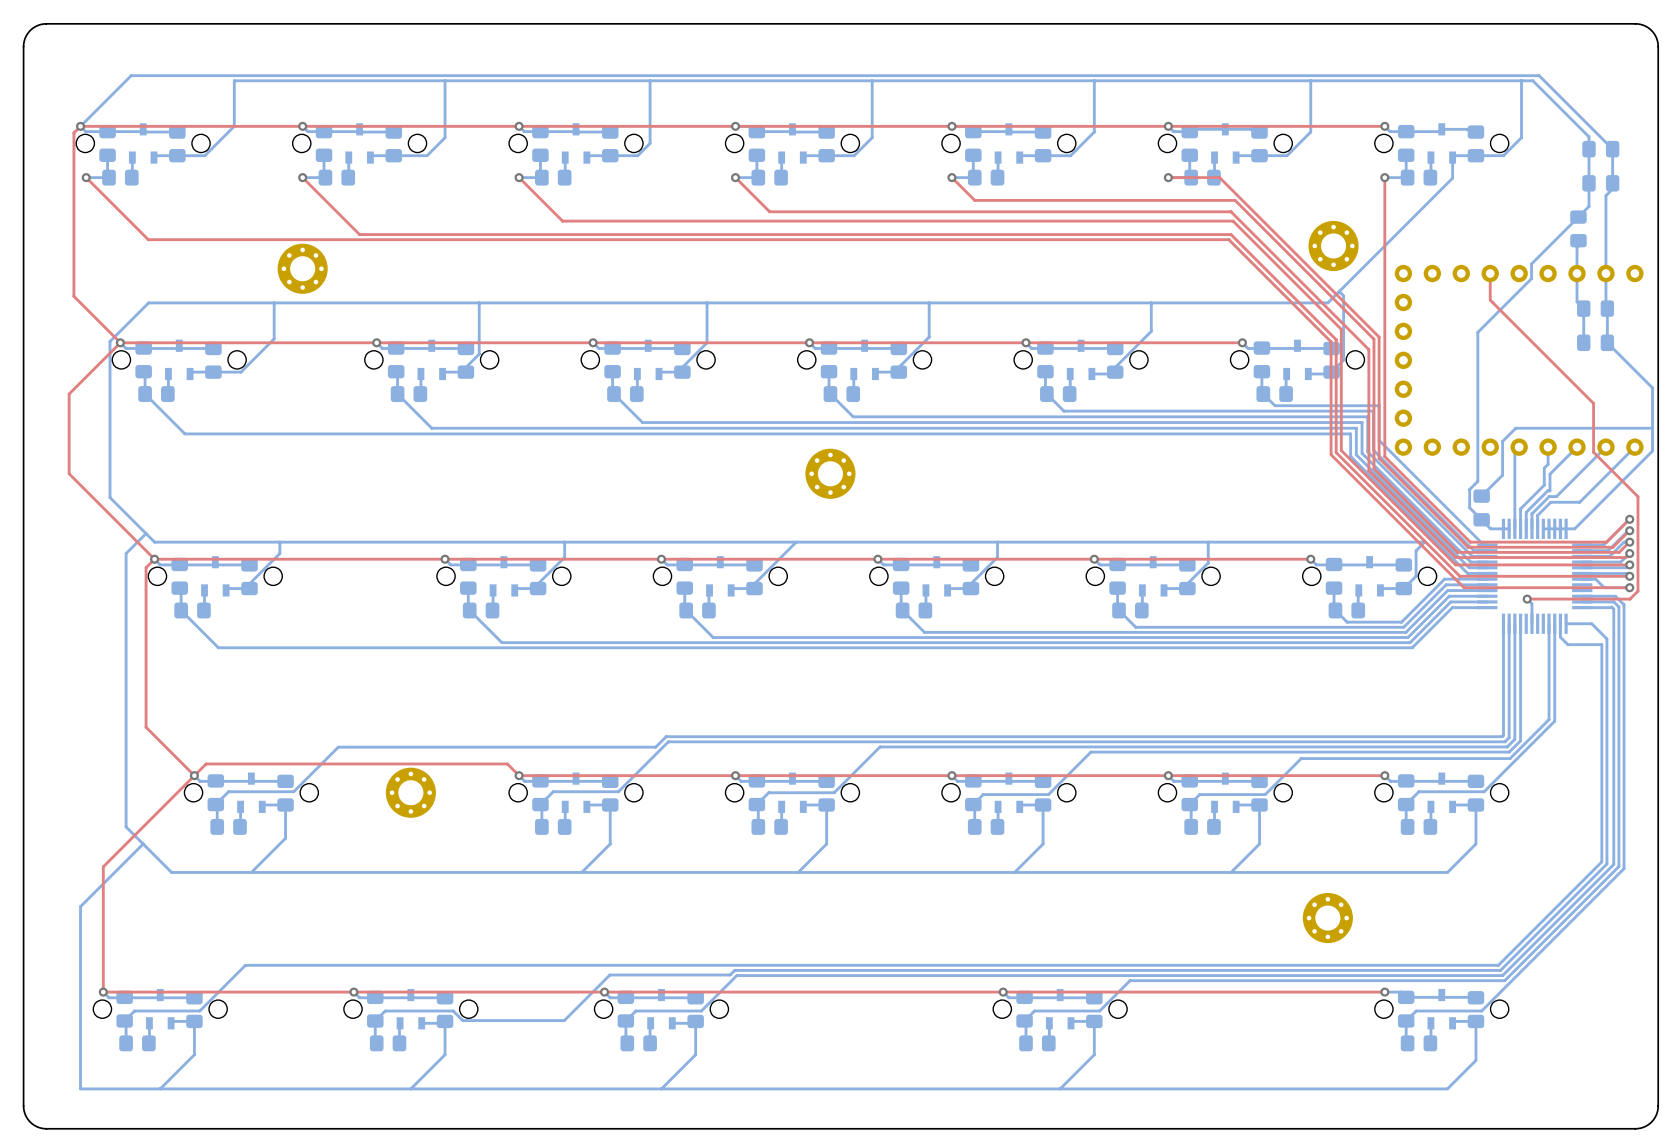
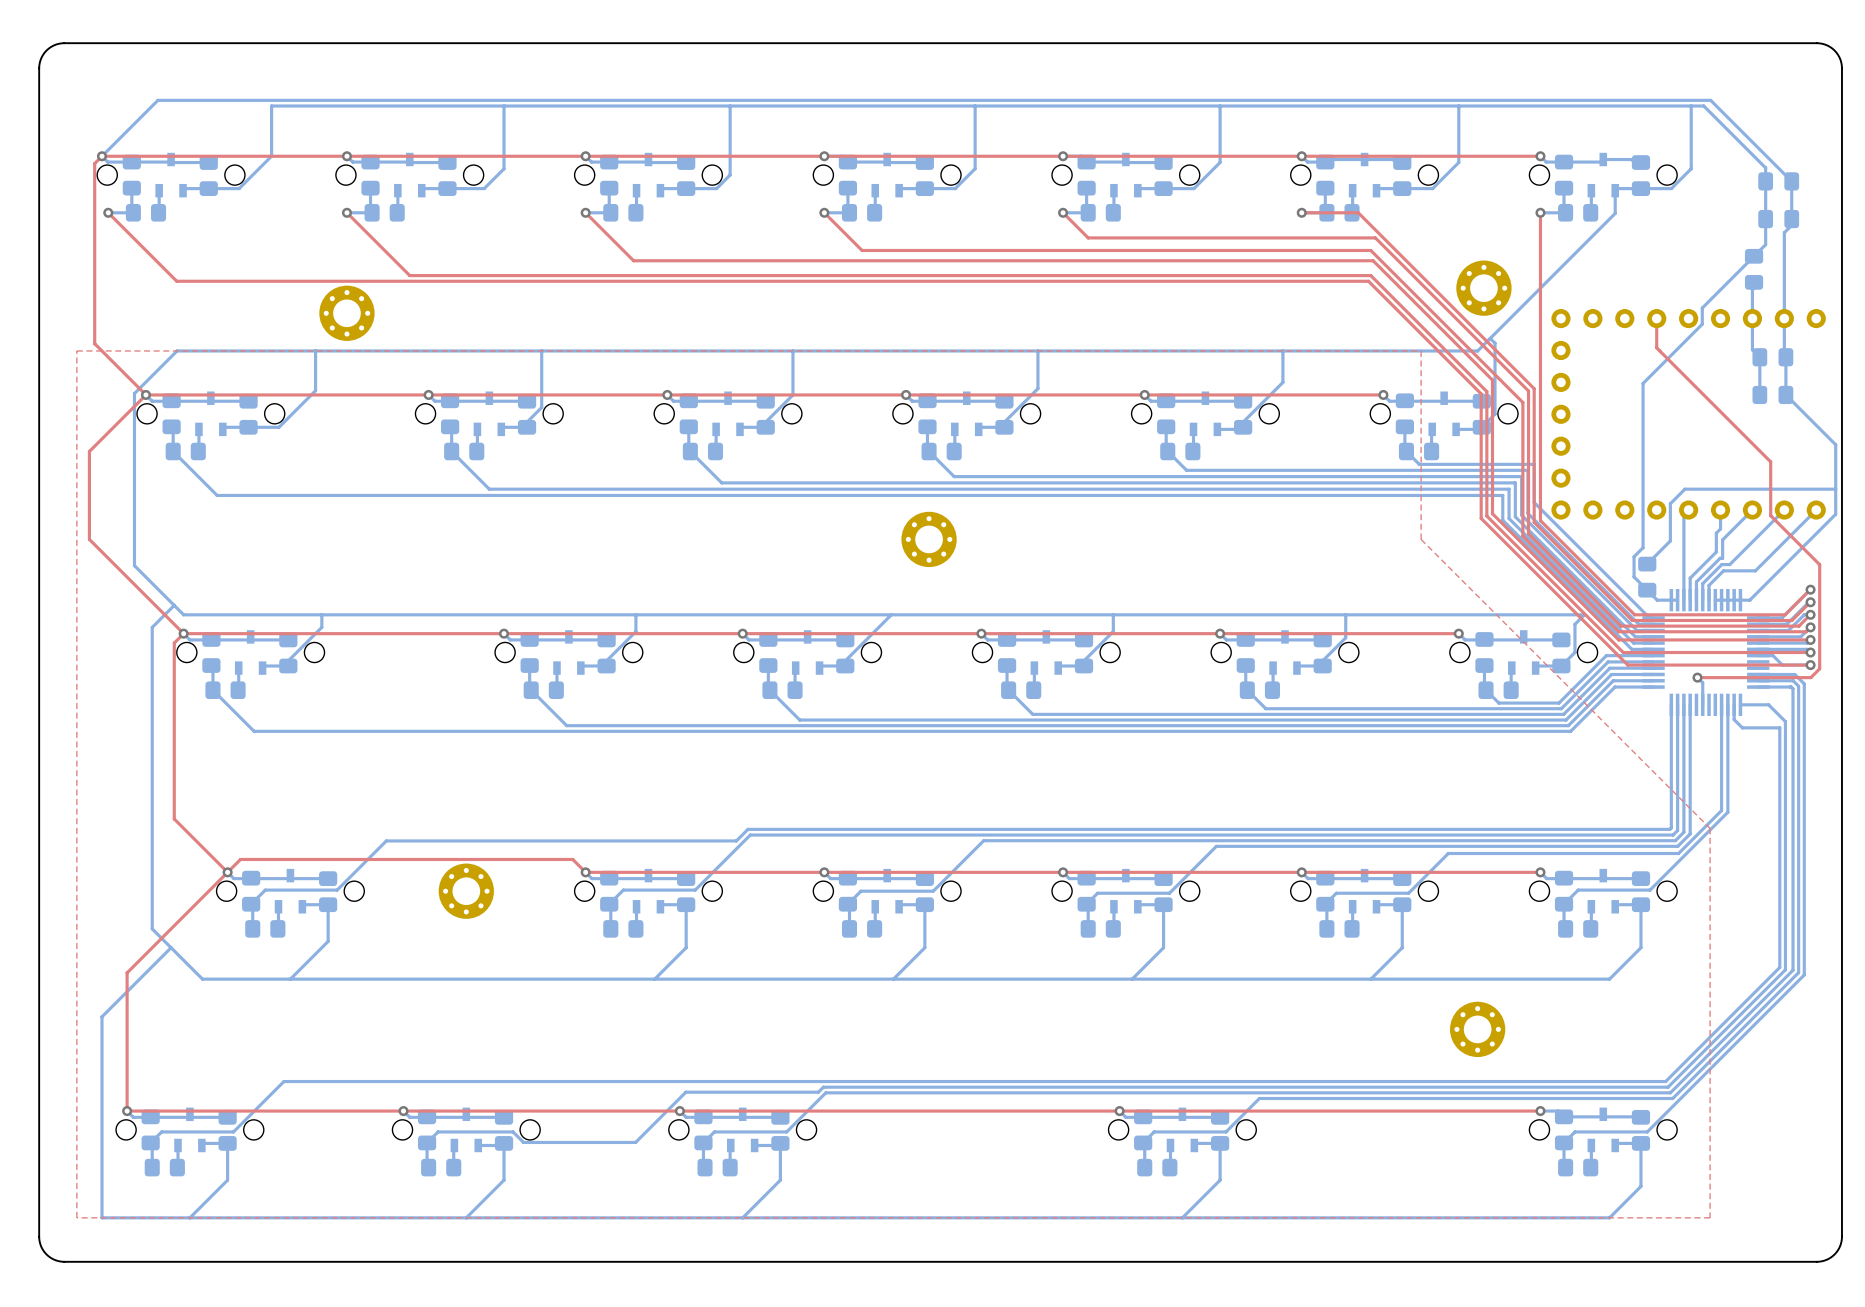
top zone outline: none -> (76, 350) (76, 1217) (1710, 1217) (1710, 828) (1421, 539) (1421, 350) (76, 350)

